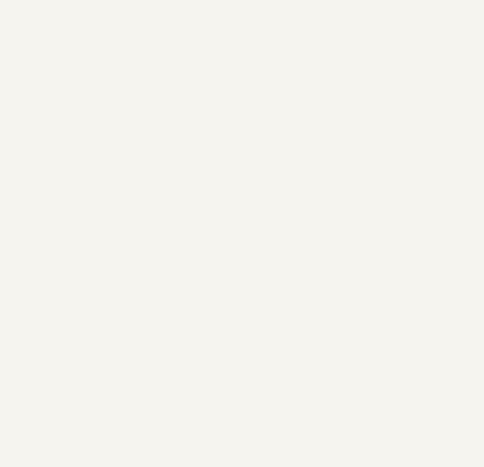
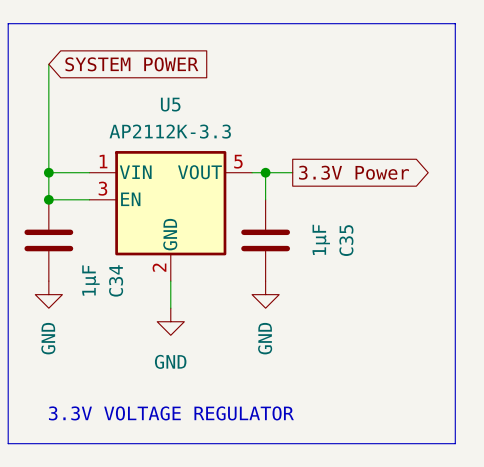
line: none -> (8, 23) (455, 23) (455, 443) (8, 443) (8, 23)
wire: none -> (48, 64) (48, 199) (89, 199)
global label: none -> SYSTEM POWER (131, 64)
wire: none -> (48, 172) (89, 172)
junction: none -> (48, 172)
wire: none -> (252, 172) (292, 172)
wire: none -> (265, 172) (265, 199)
junction: none -> (265, 172)
global label: none -> 3.3V Power (354, 172)
junction: none -> (48, 199)
U5: none -> AP2112K-3.3 (170, 216)
C34: none -> 1µF (48, 240)
C35: none -> 1µF (265, 240)
wire: none -> (170, 281) (170, 308)
power symbol: none -> GND (48, 294)
power symbol: none -> GND (265, 294)
power symbol: none -> GND (170, 321)
text: none -> 3.3V VOLTAGE REGULATOR (171, 413)

